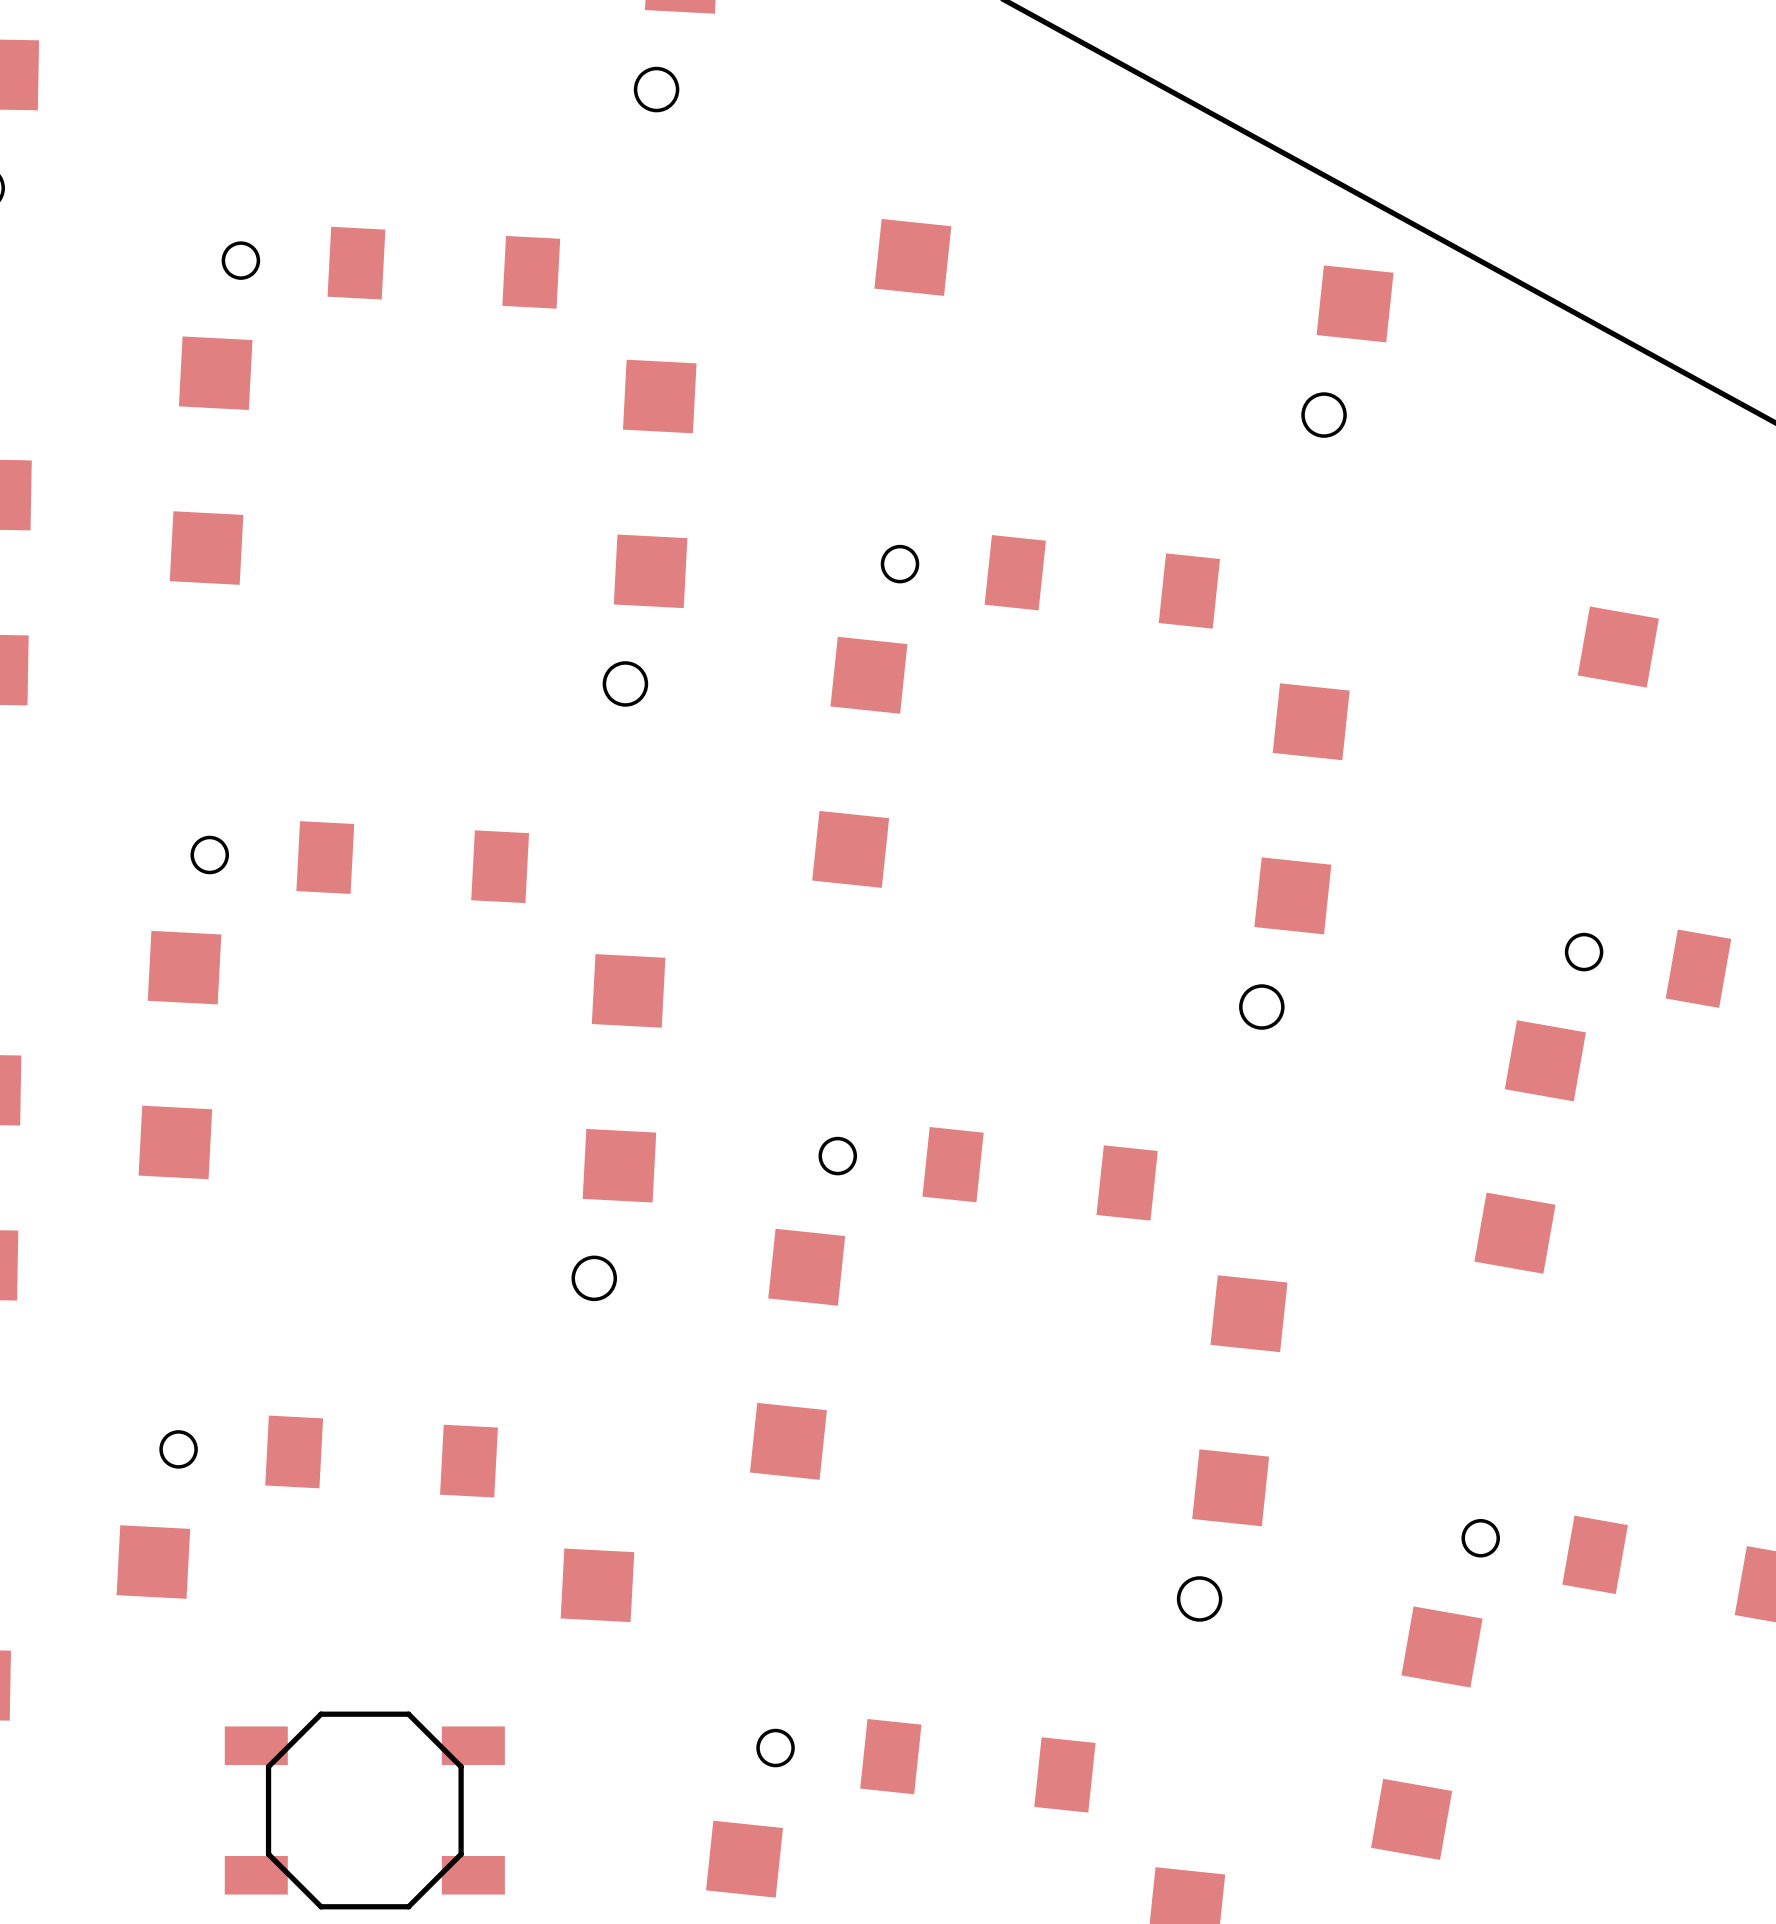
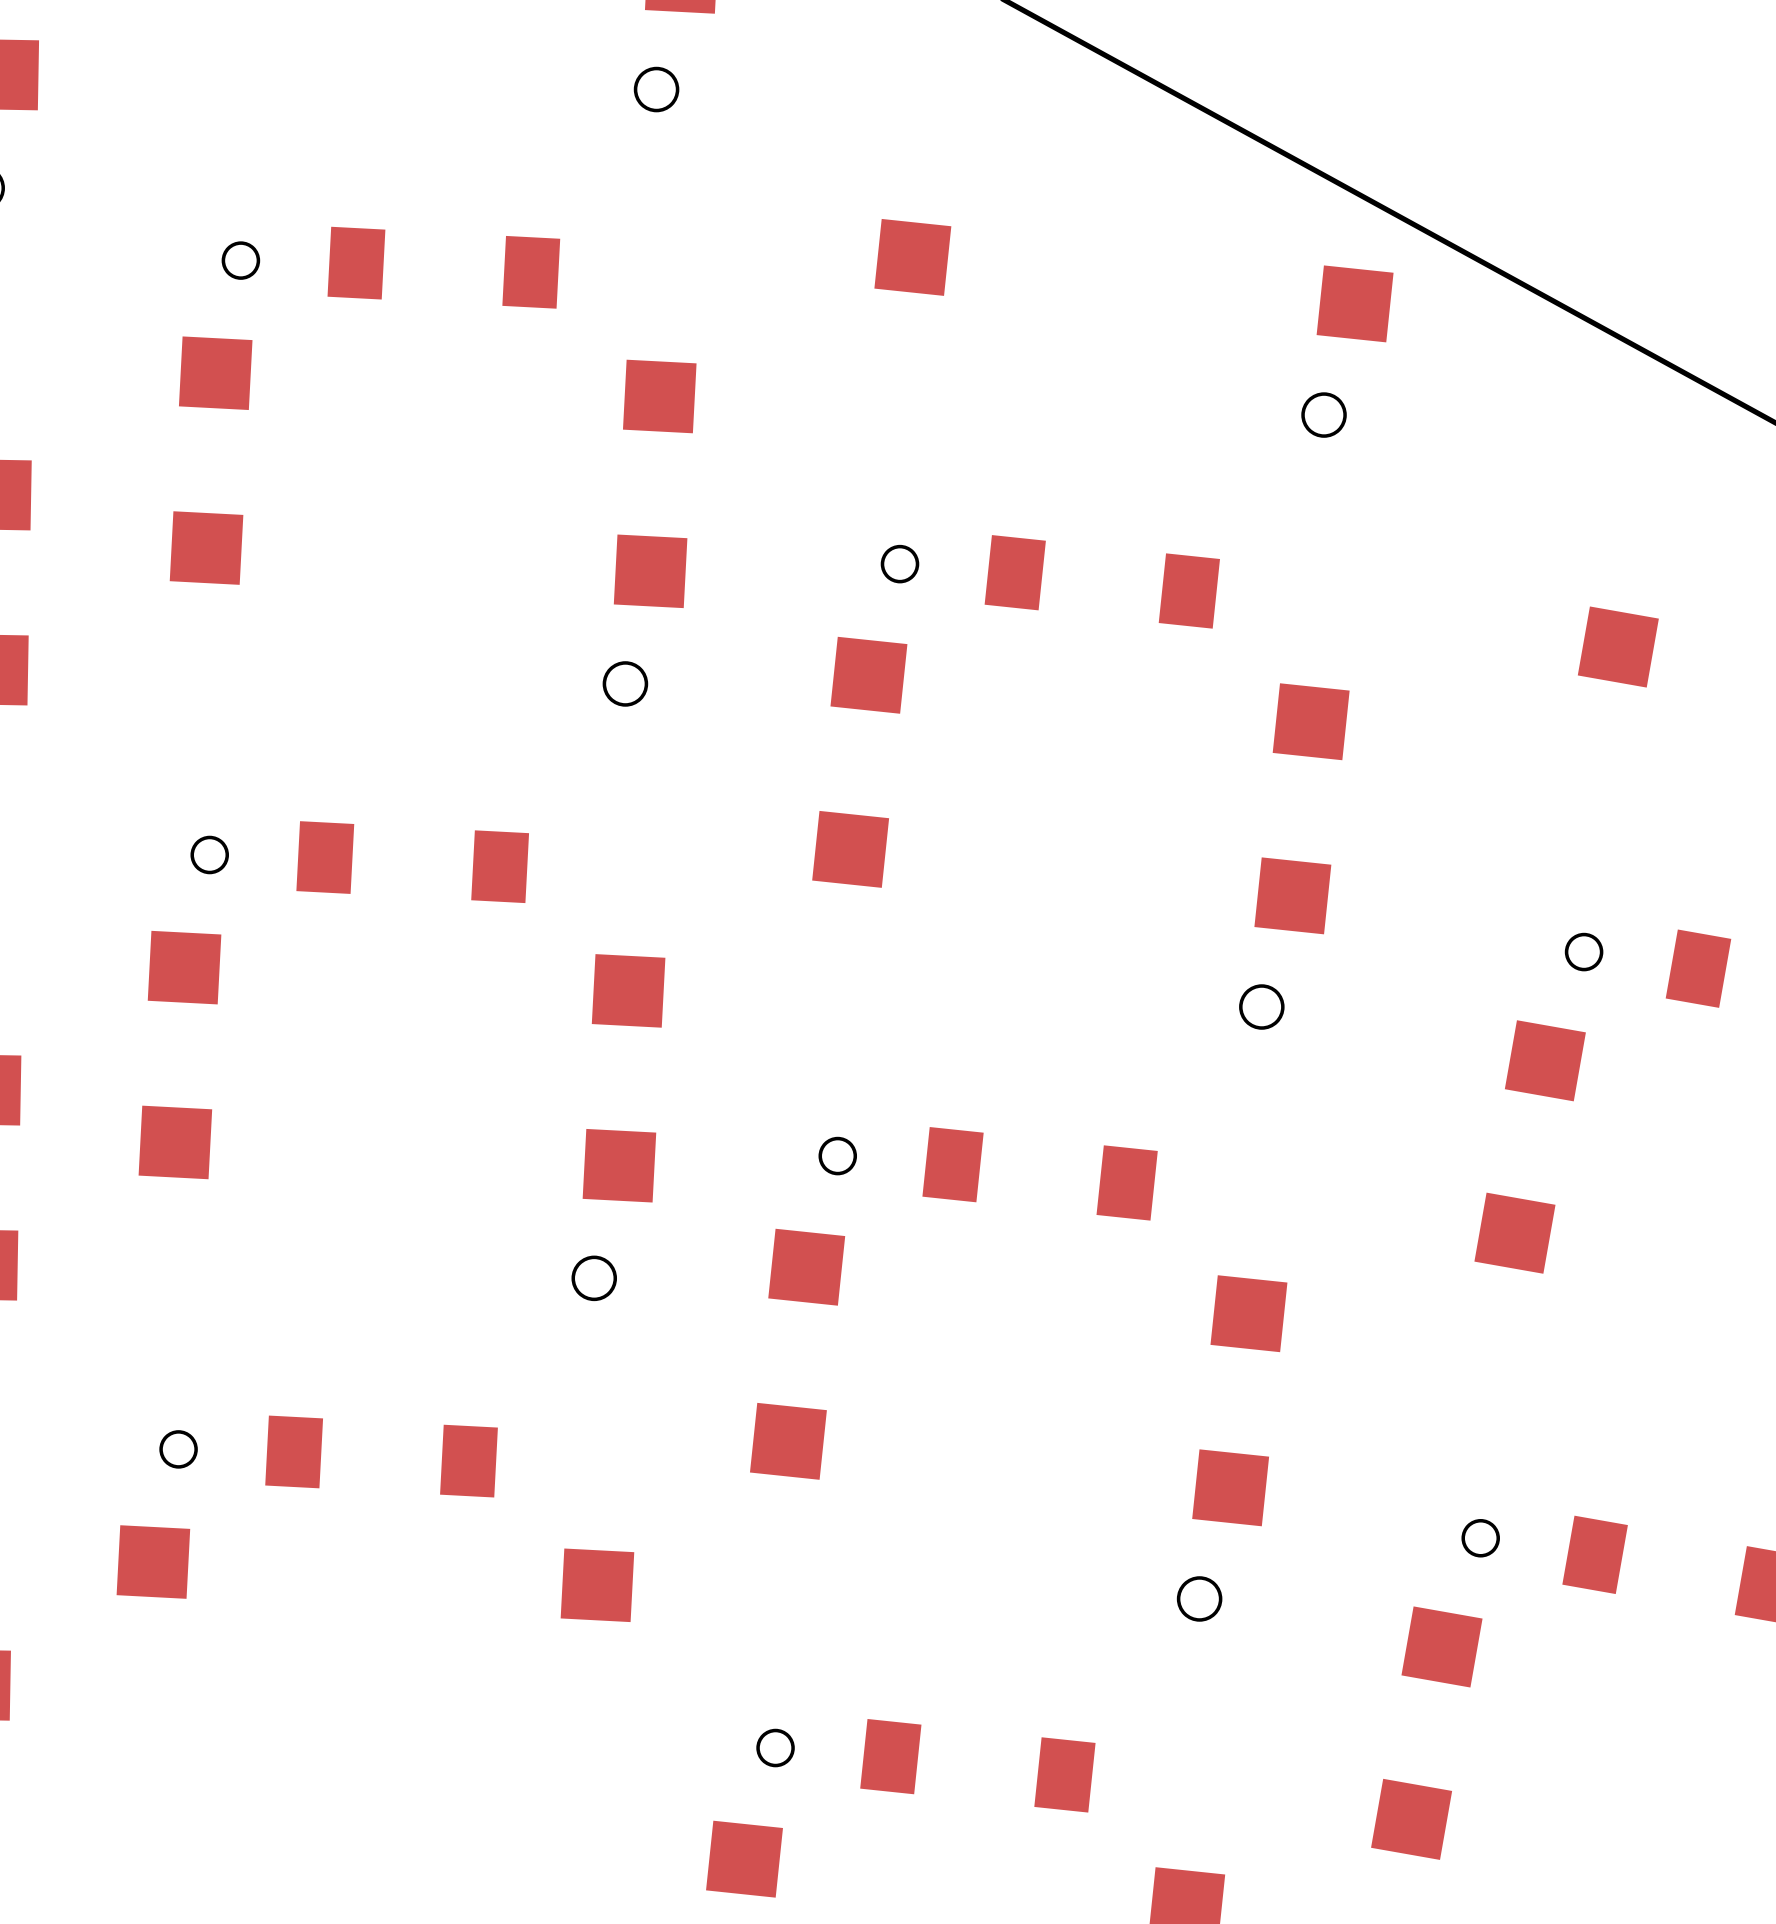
part: (364, 1810) -> none

